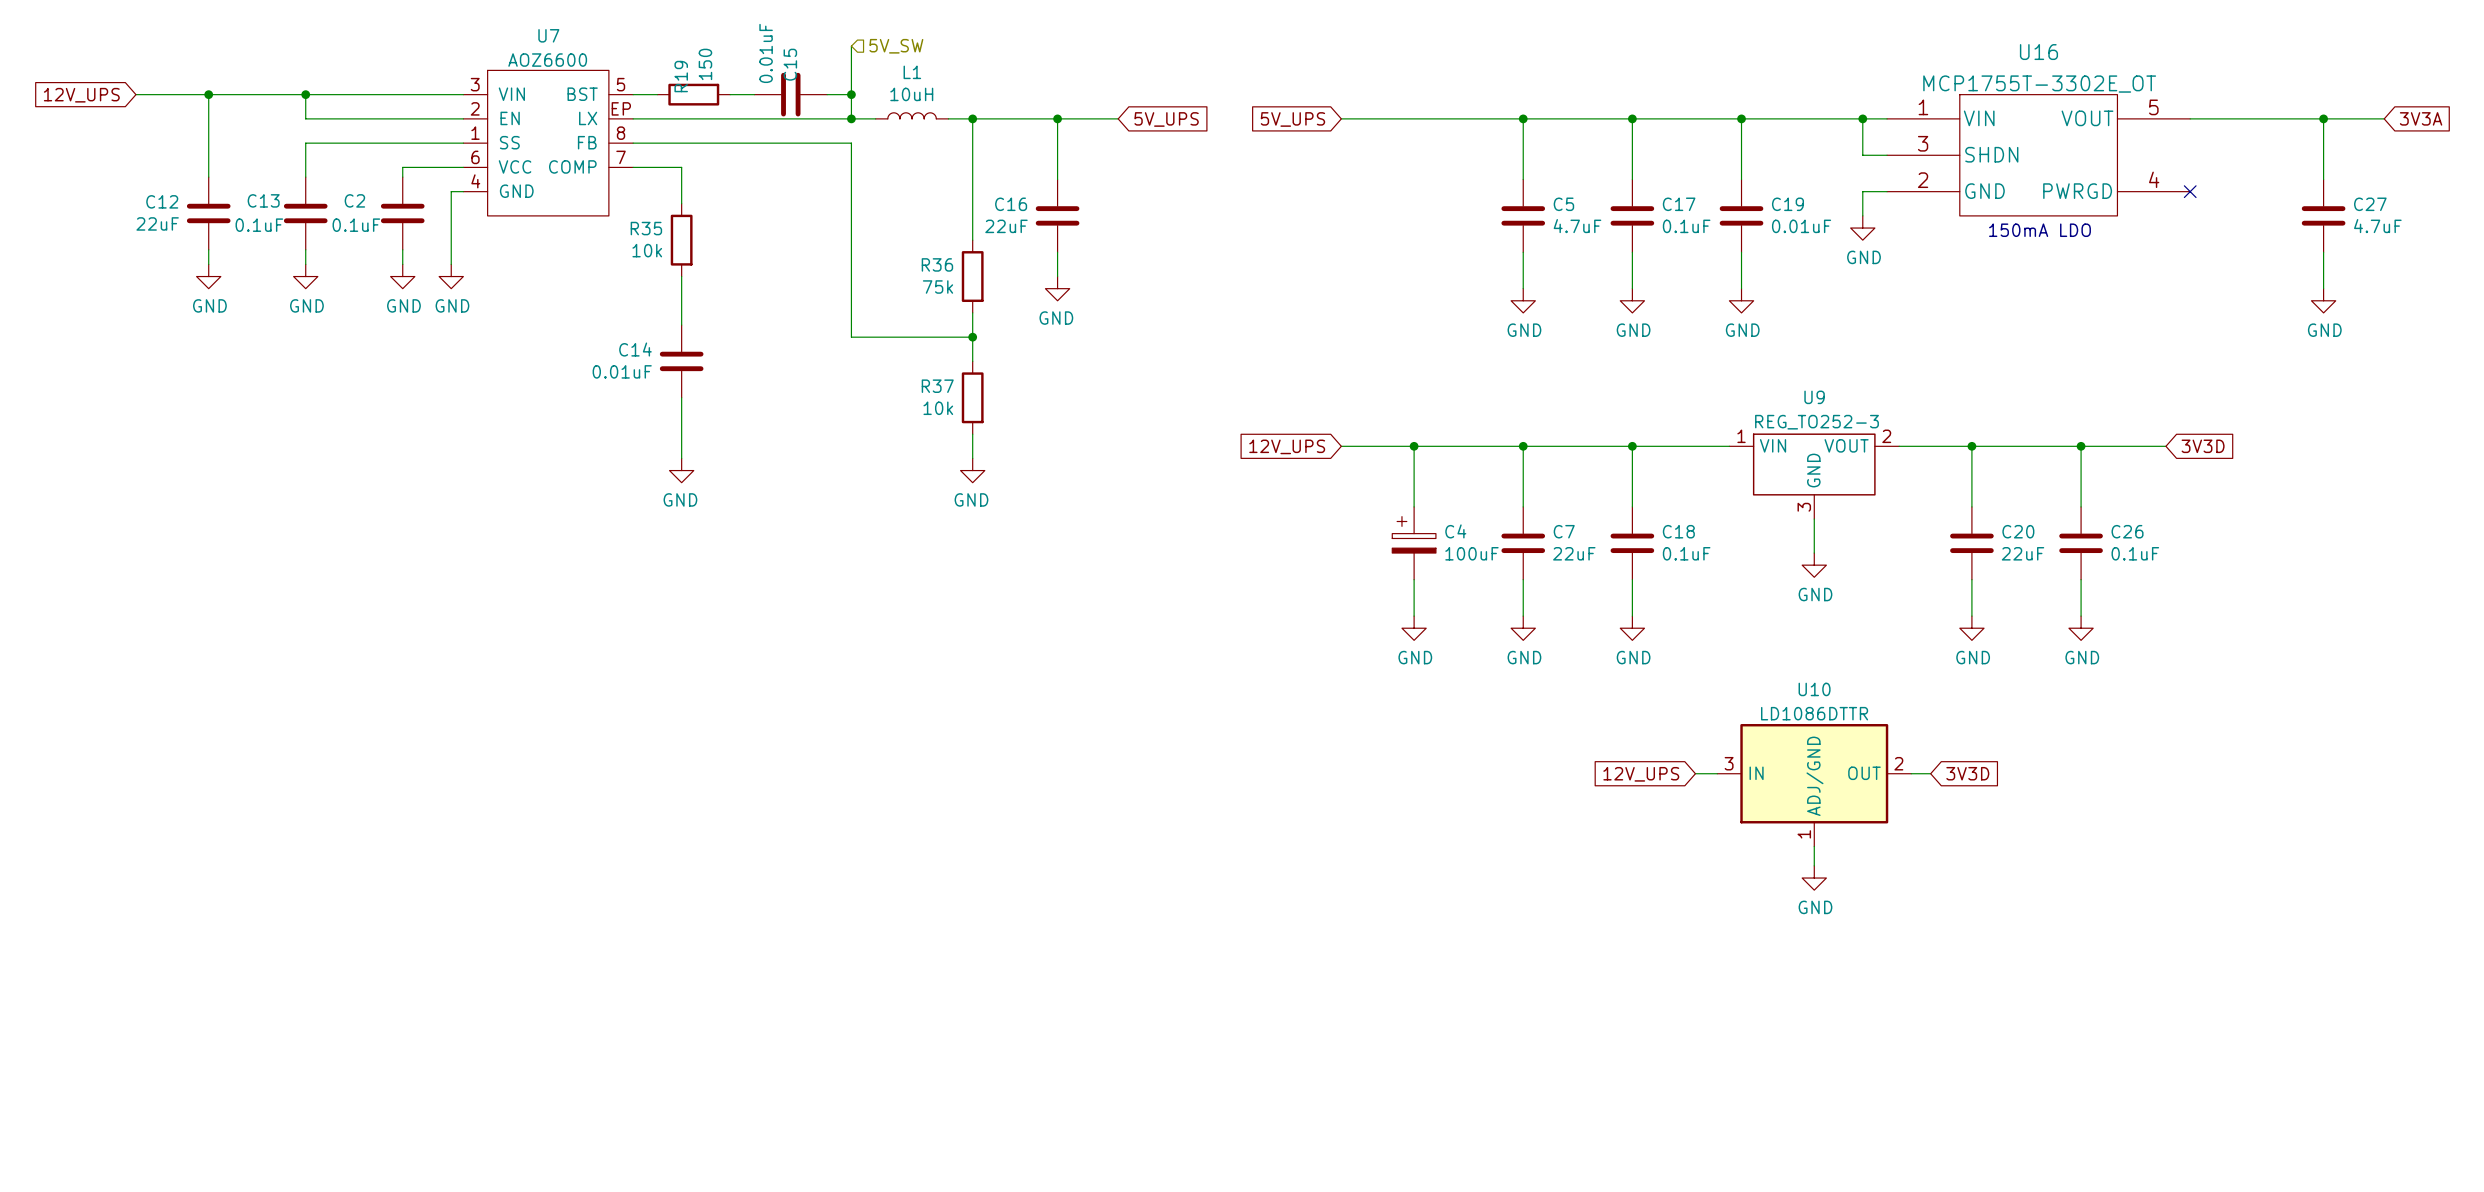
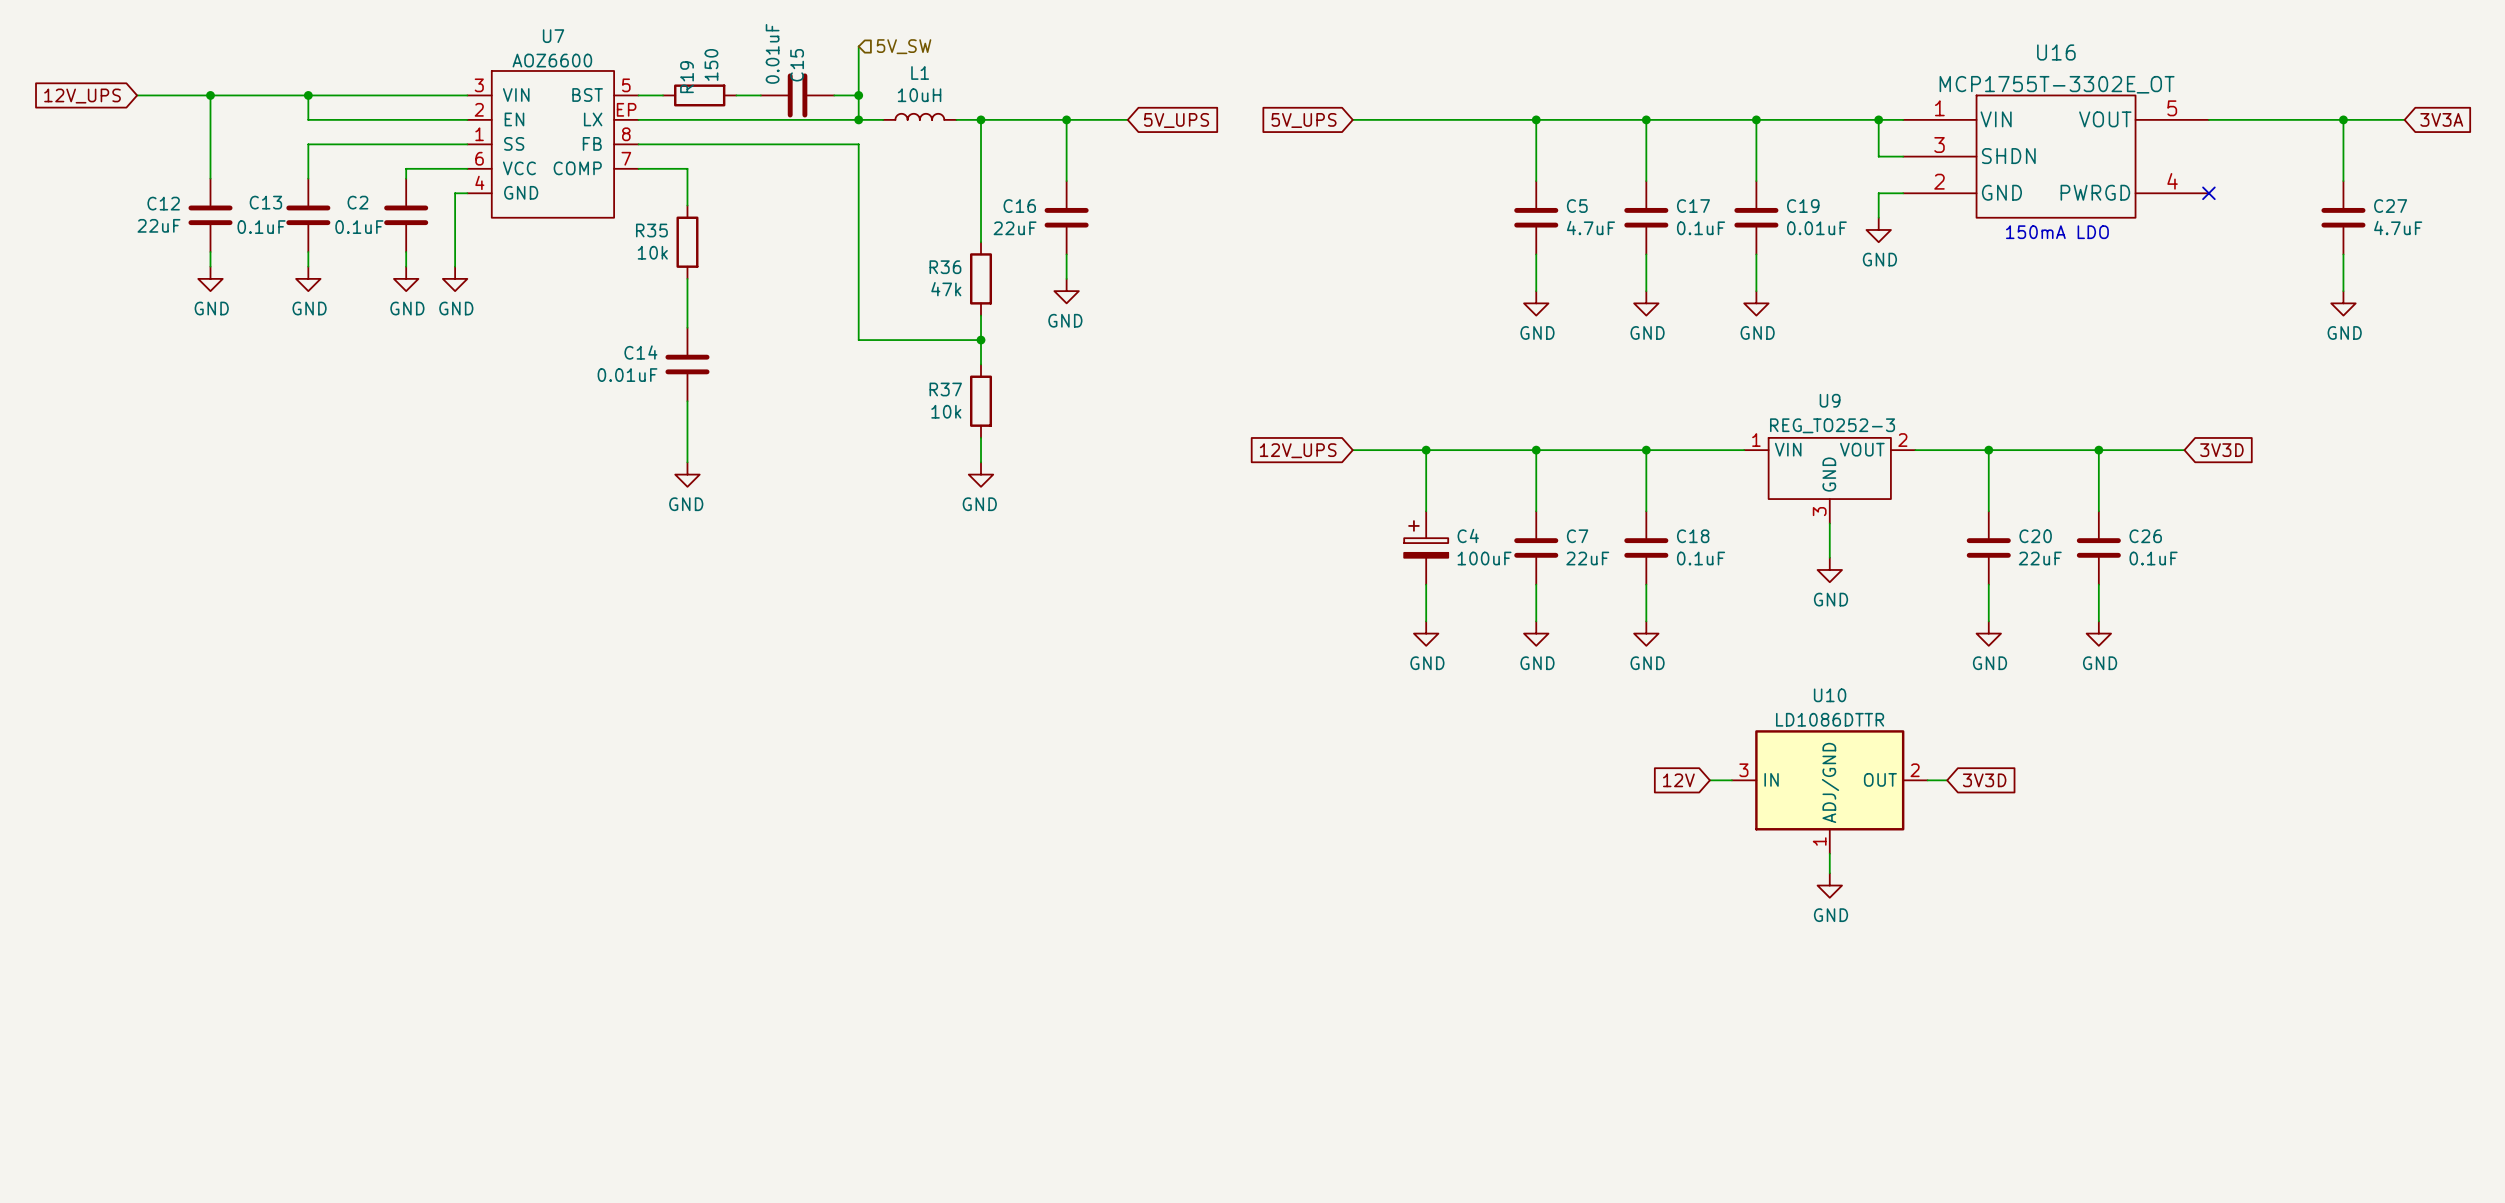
R36 value: 75k (938, 287) -> 47k (946, 289)
global label: 12V_UPS (1641, 774) -> 12V (1678, 780)

